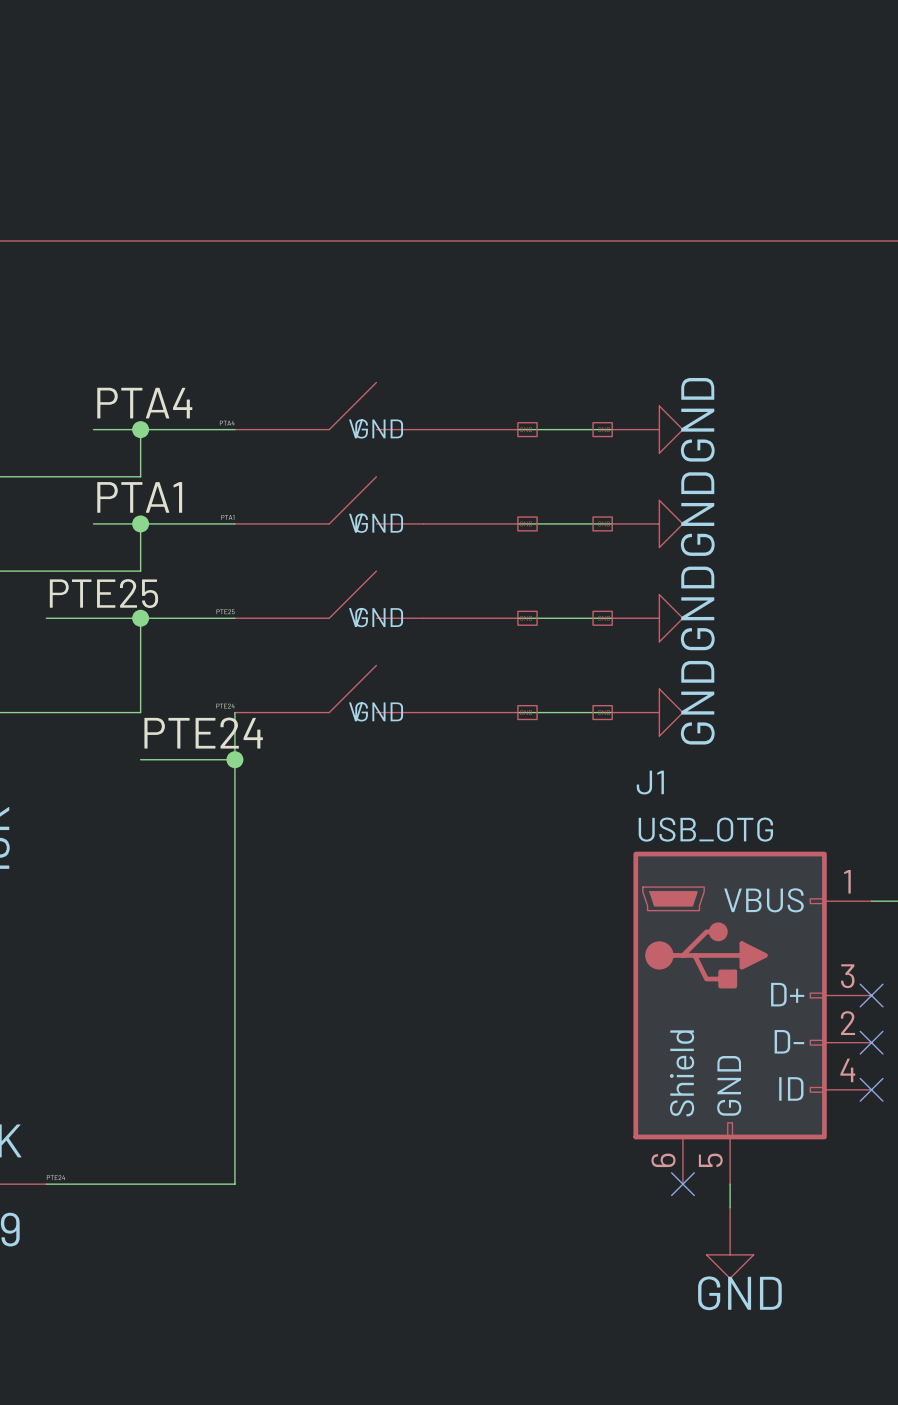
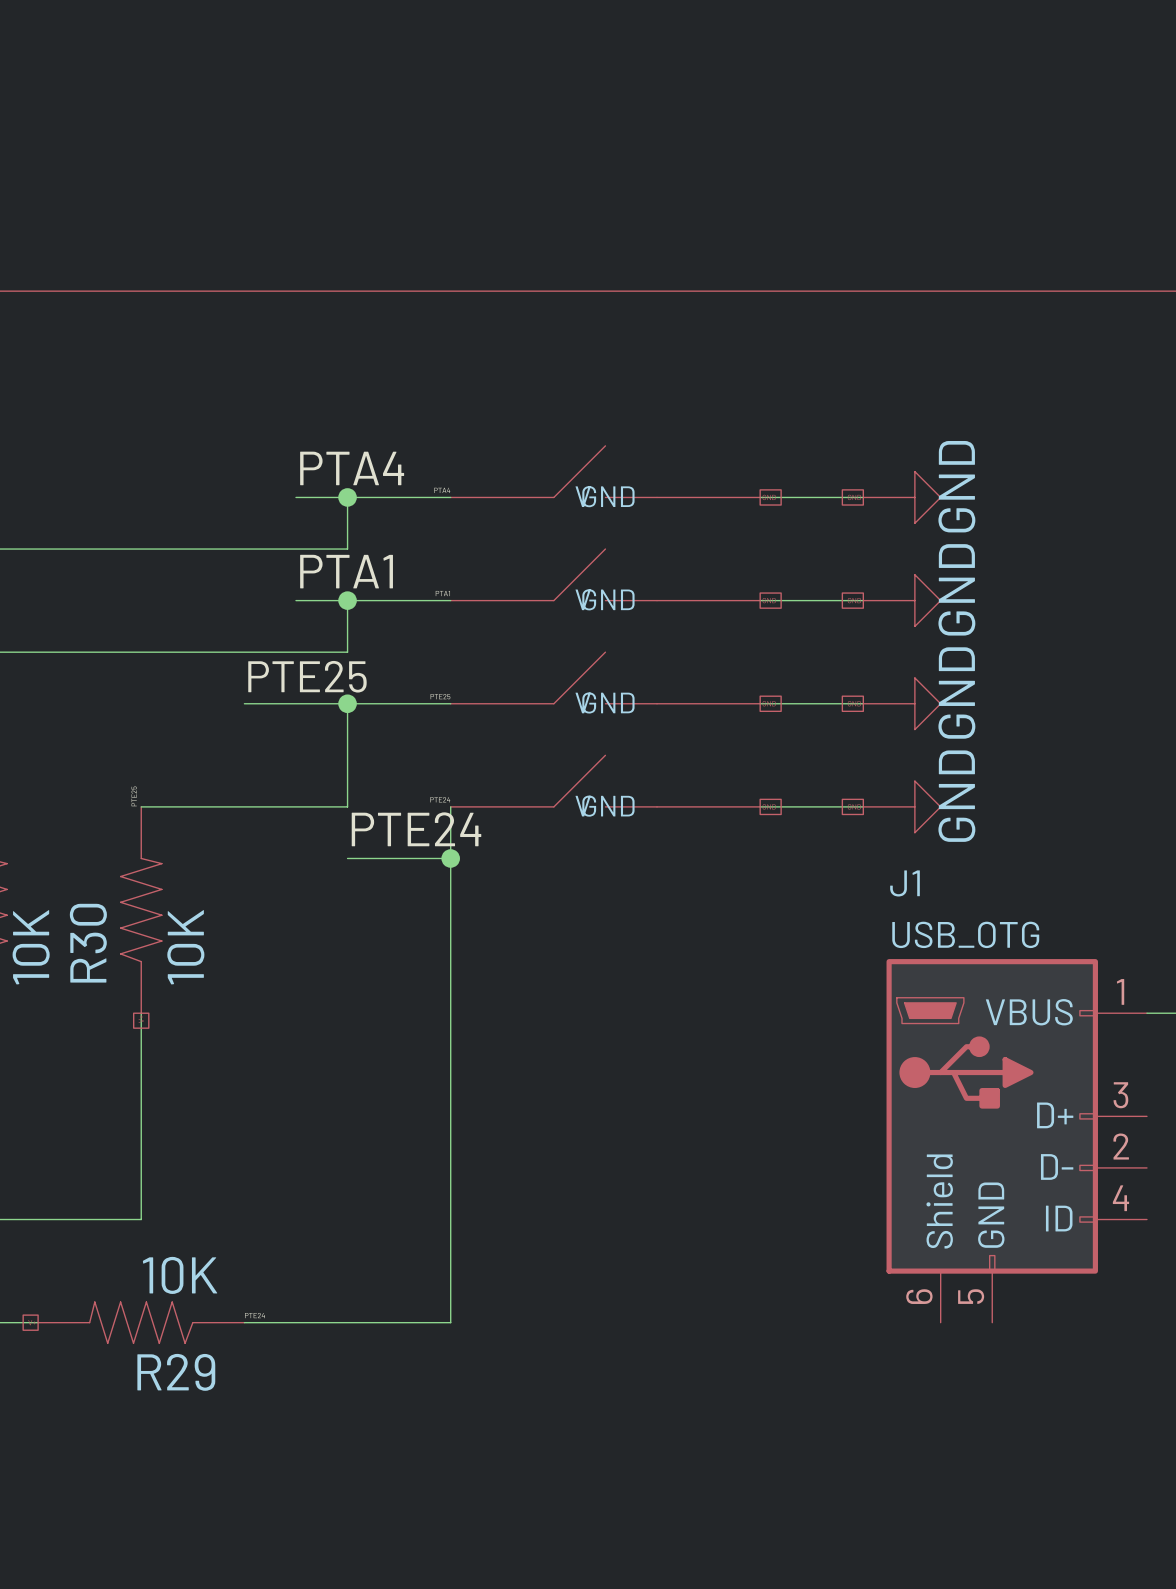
no-connect mark: (871, 995) -> none
no-connect mark: (871, 1042) -> none
no-connect mark: (871, 1089) -> none
no-connect mark: (682, 1184) -> none
wire: (730, 1184) (730, 1207) -> none
power symbol: GND (730, 1243) -> none

